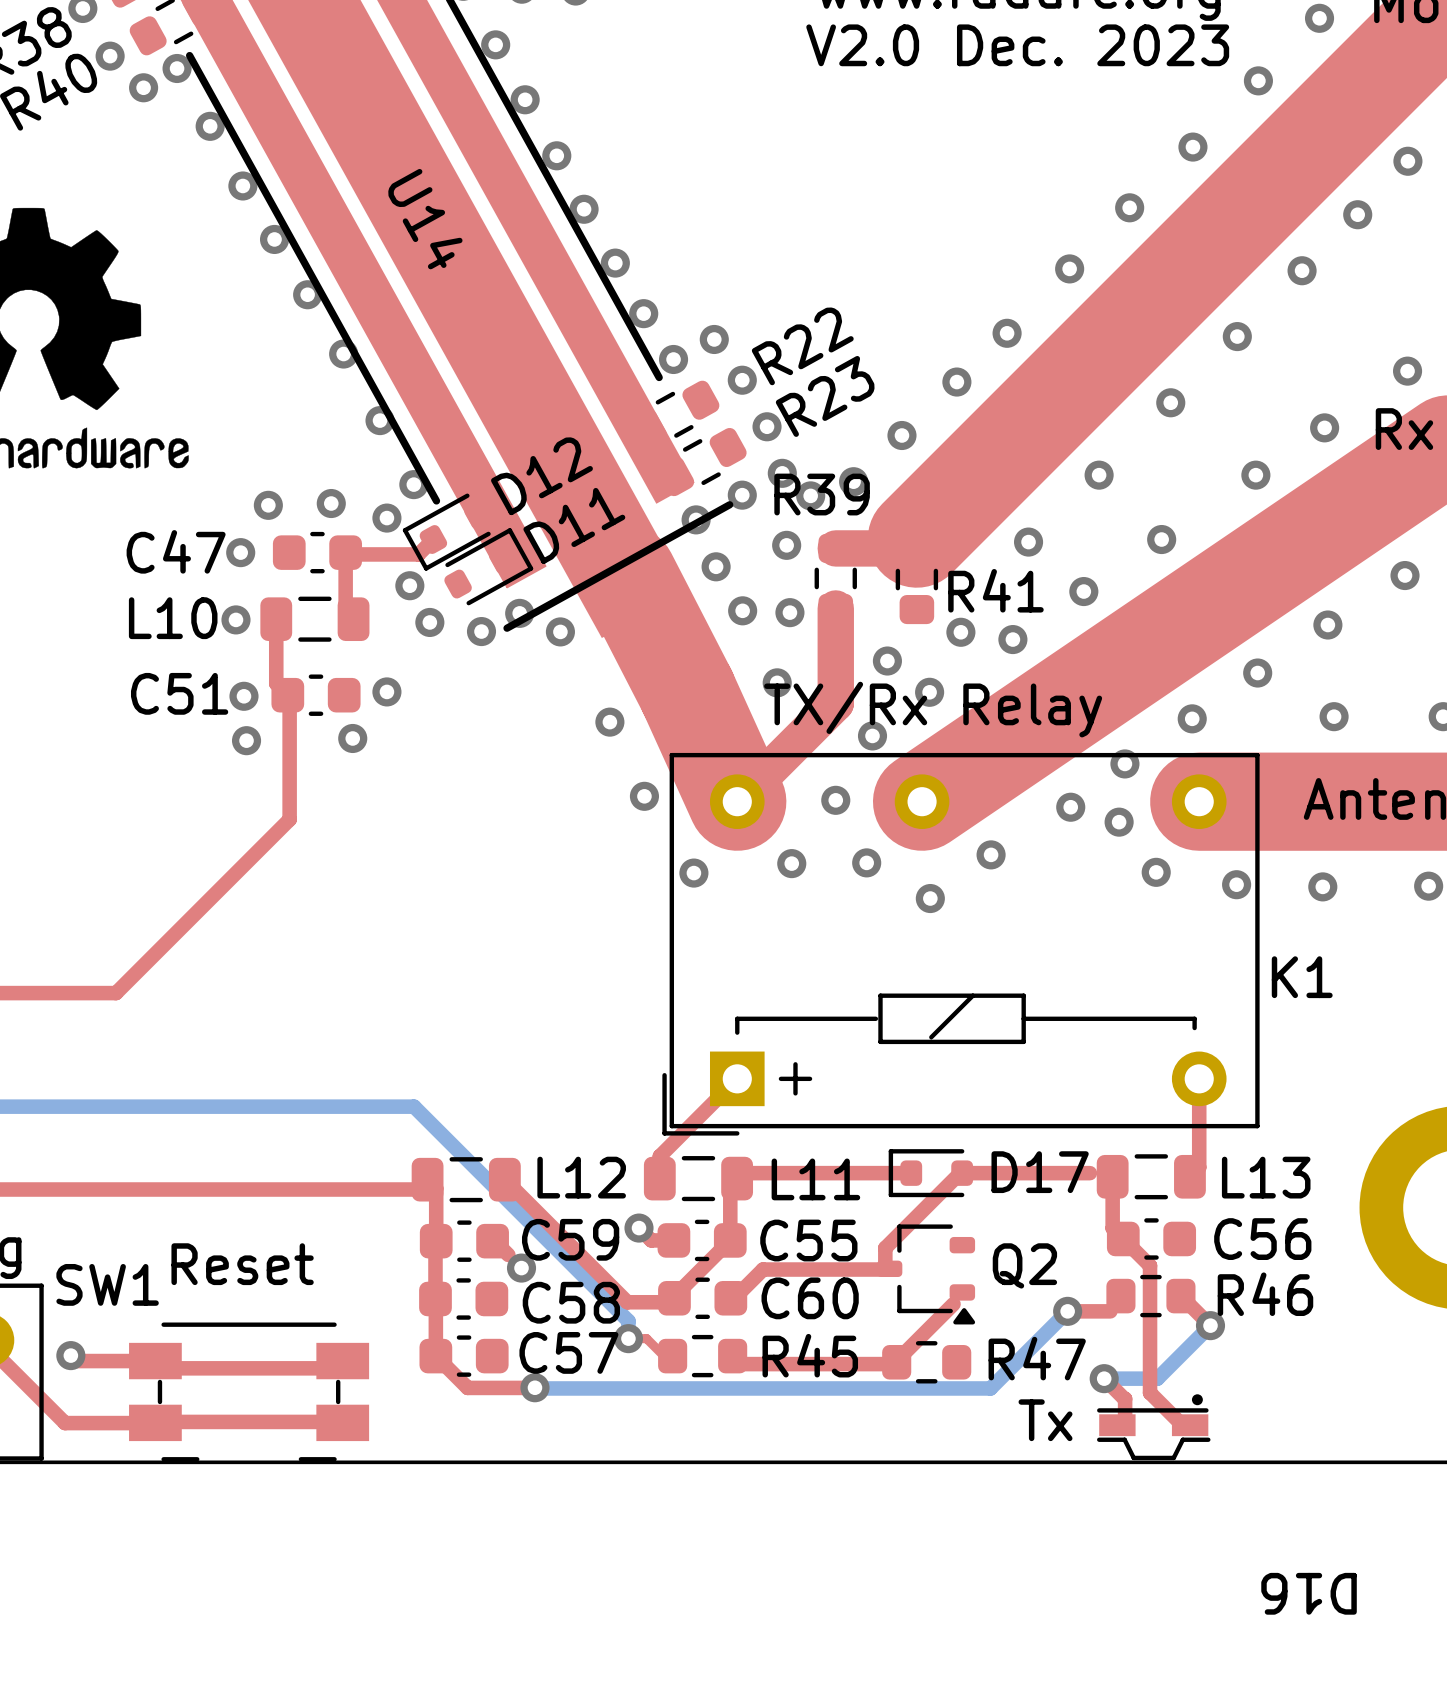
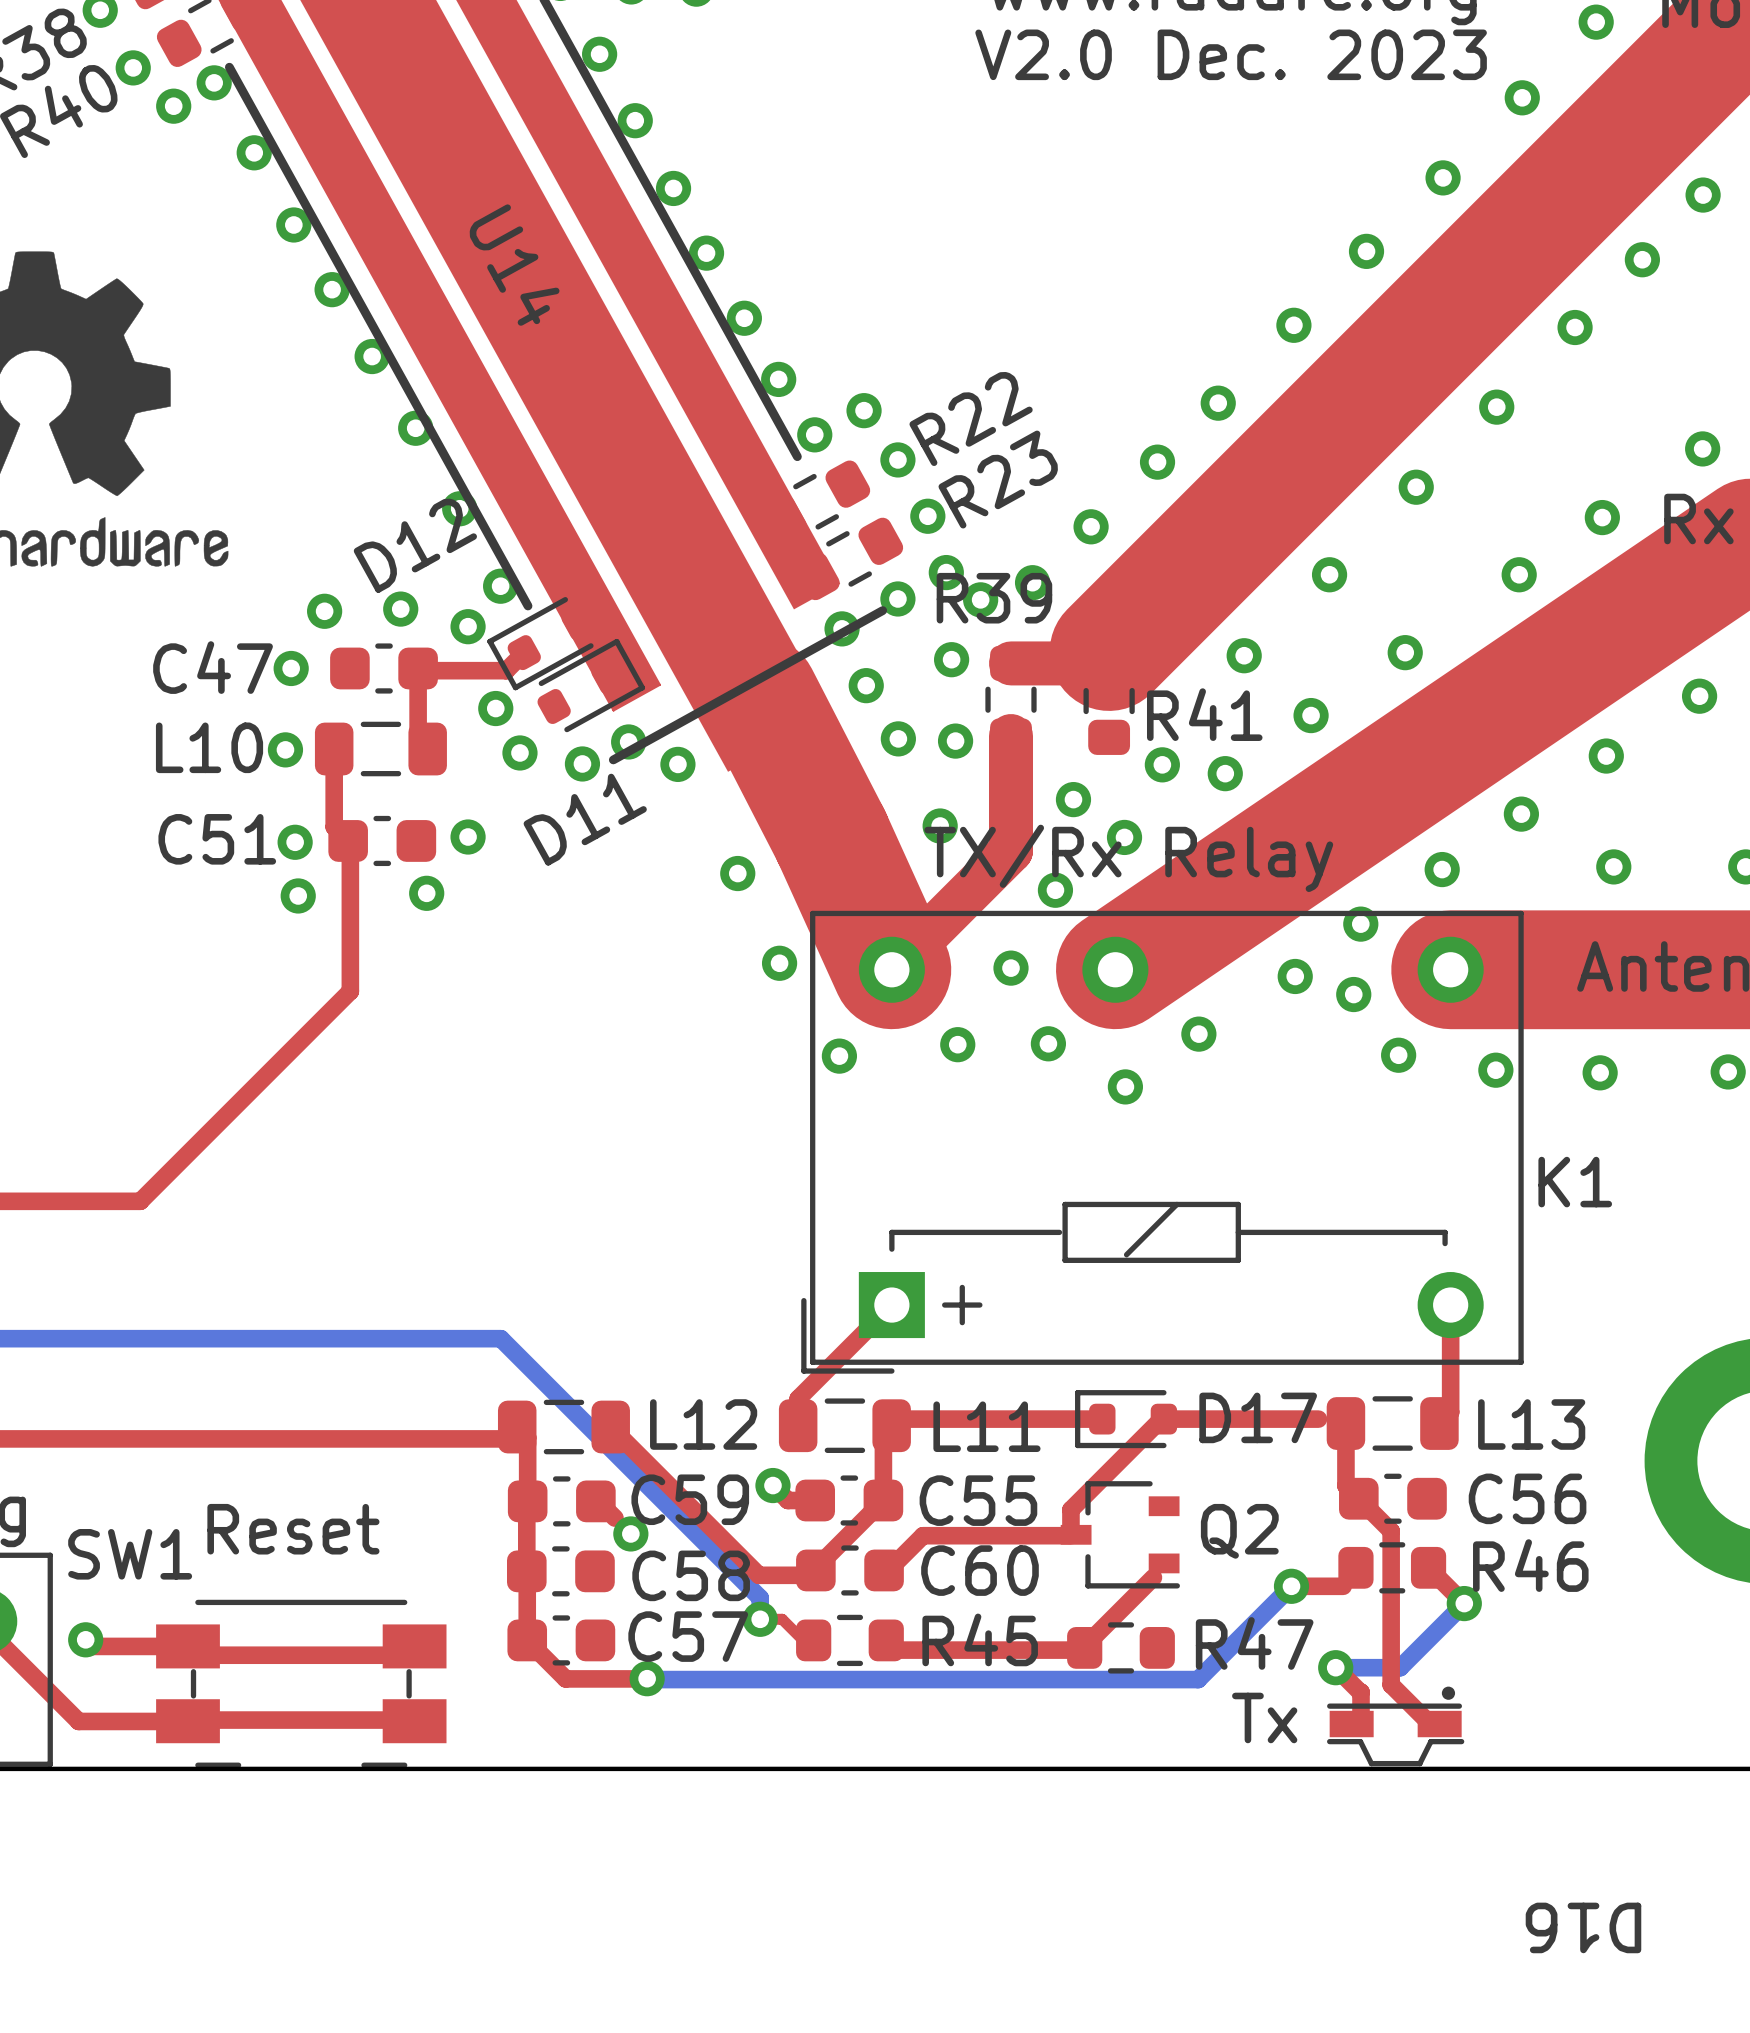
D12 name position: D12 (541, 476) -> D12 (415, 545)
D11 name position: D11 (574, 525) -> D11 (585, 819)
Q2 footprint: [876, 1224, 976, 1325] -> [1060, 1481, 1180, 1589]

